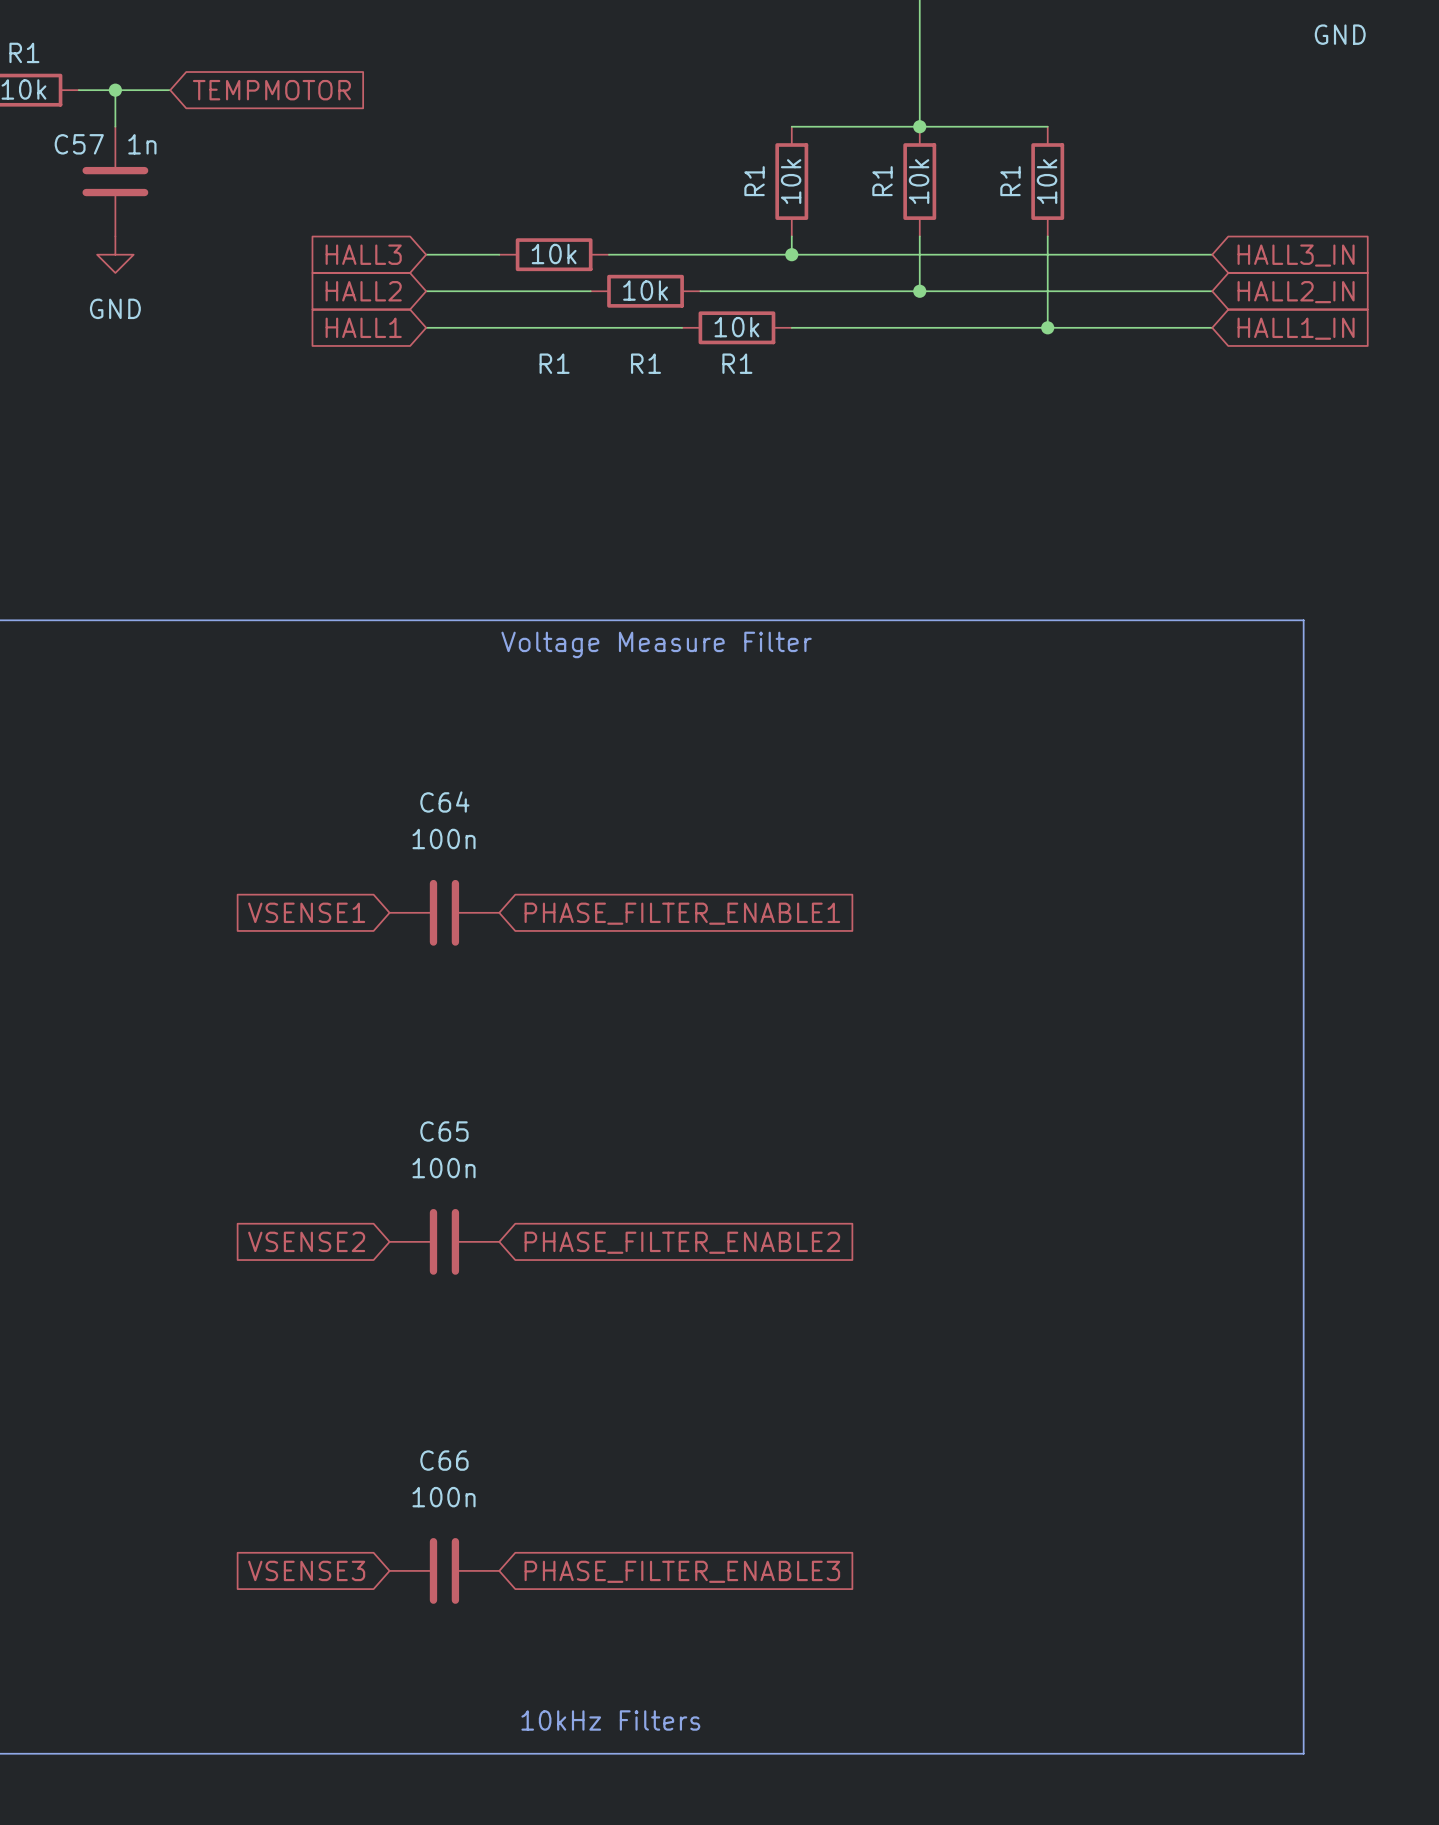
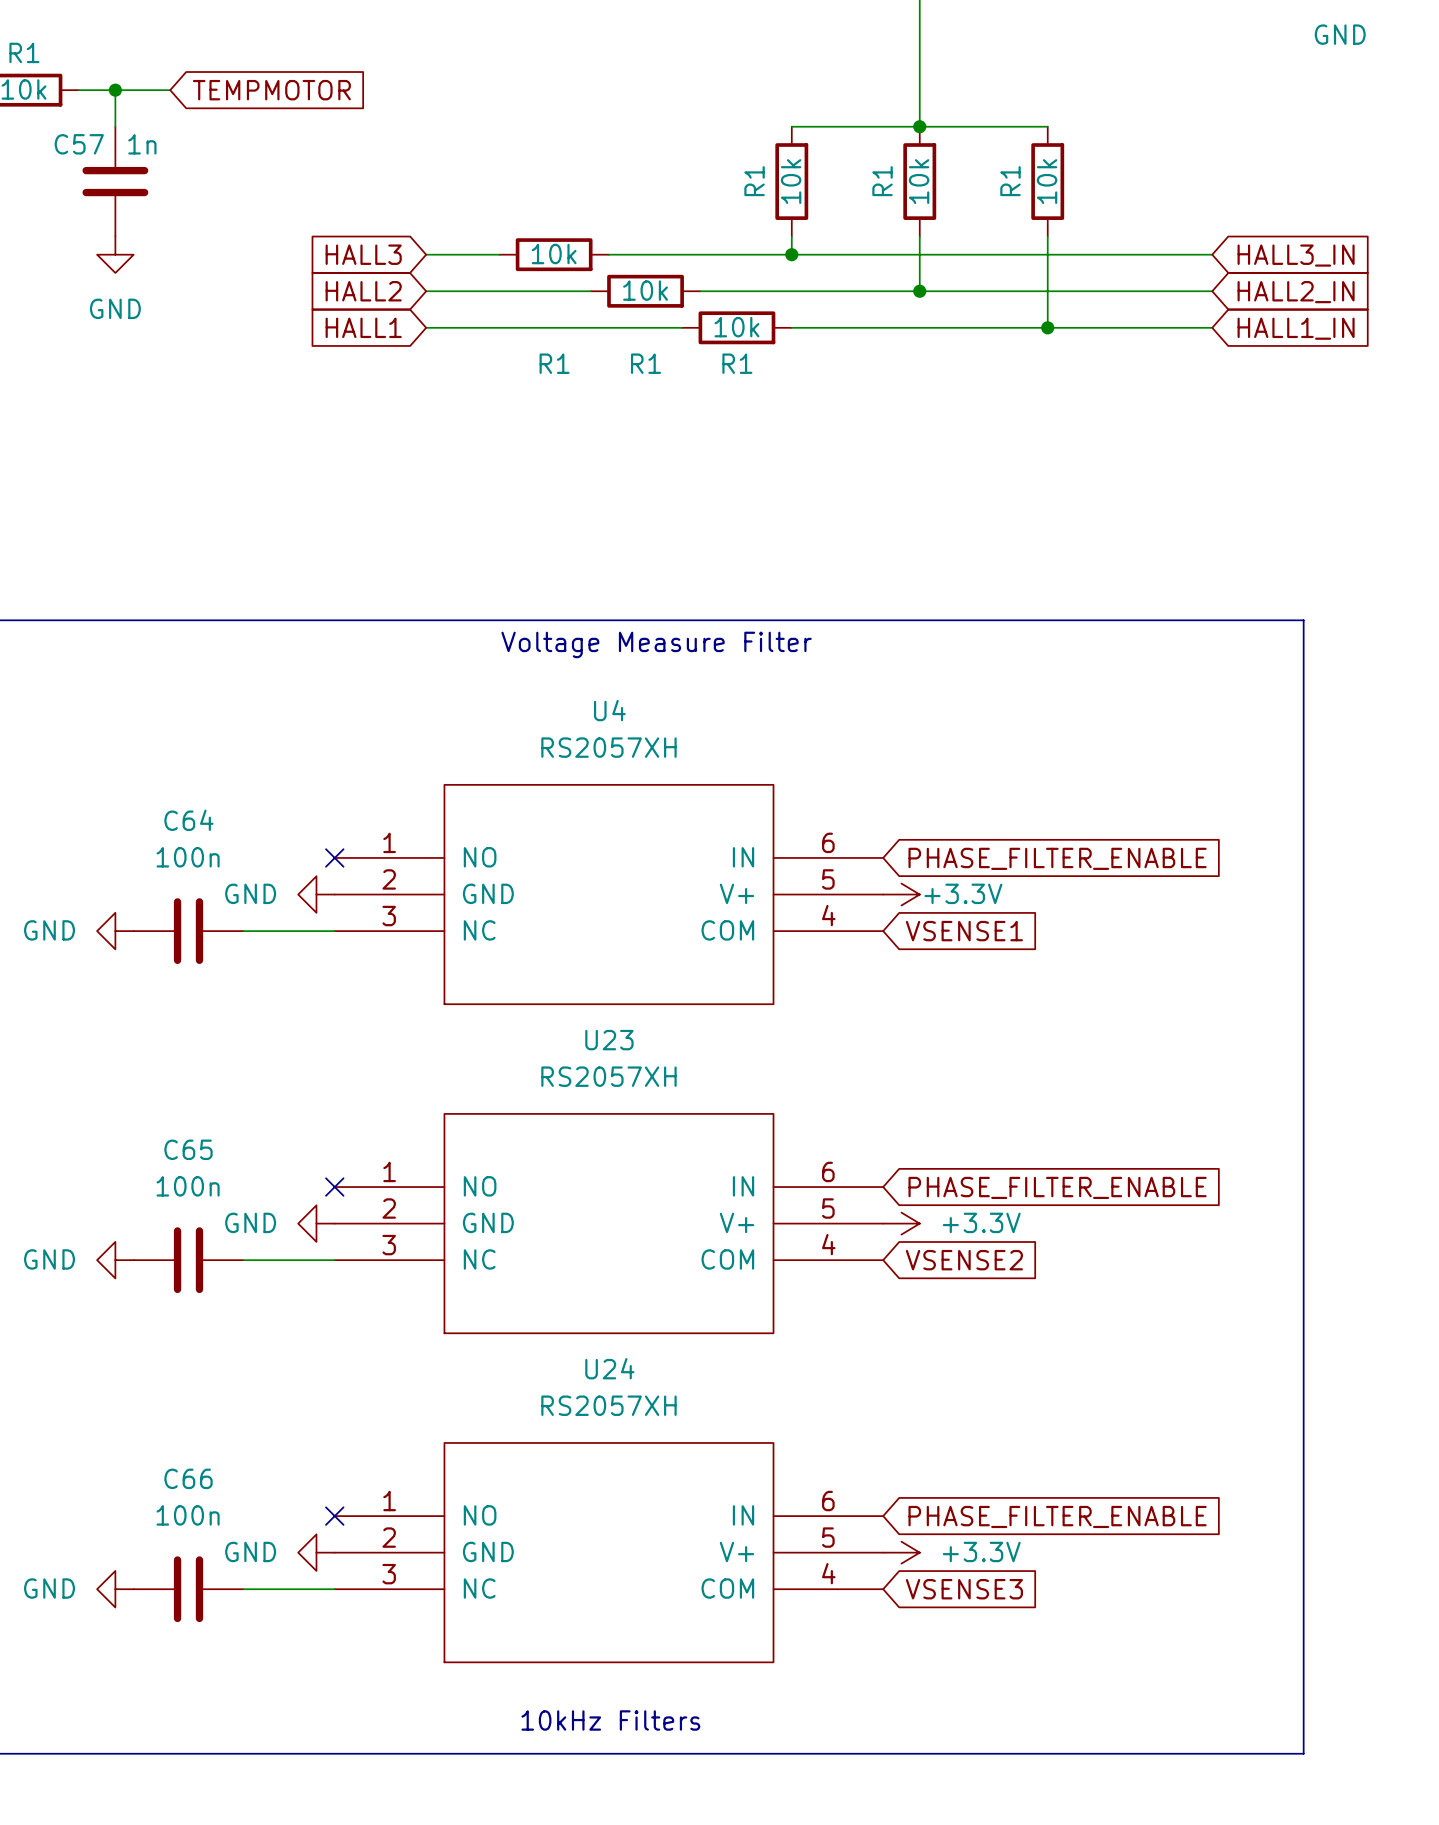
no-connect mark: none -> (334, 857)
global label: none -> PHASE_FILTER_ENABLE (1057, 858)
power symbol: none -> GND (316, 894)
U4: none -> RS2057XH (608, 894)
power symbol: none -> +3.3V (901, 894)
global label: VSENSE1 (306, 912) -> none
C64 position: (444, 912) -> (188, 931)
global label: PHASE_FILTER_ENABLE1 (682, 913) -> none
power symbol: none -> GND (115, 931)
global label: none -> VSENSE1 (964, 931)
no-connect mark: none -> (334, 1187)
global label: none -> PHASE_FILTER_ENABLE (1057, 1187)
power symbol: none -> GND (316, 1223)
U23: none -> RS2057XH (608, 1223)
power symbol: none -> +3.3V (901, 1223)
global label: VSENSE2 (306, 1241) -> none
C65 position: (444, 1241) -> (188, 1260)
global label: PHASE_FILTER_ENABLE2 (682, 1242) -> none
power symbol: none -> GND (115, 1260)
global label: none -> VSENSE2 (964, 1260)
no-connect mark: none -> (334, 1516)
global label: none -> PHASE_FILTER_ENABLE (1057, 1516)
power symbol: none -> GND (316, 1552)
U24: none -> RS2057XH (608, 1552)
power symbol: none -> +3.3V (901, 1552)
global label: VSENSE3 (306, 1570) -> none
C66 position: (444, 1570) -> (188, 1589)
global label: PHASE_FILTER_ENABLE3 (682, 1571) -> none
power symbol: none -> GND (115, 1589)
global label: none -> VSENSE3 (964, 1589)

